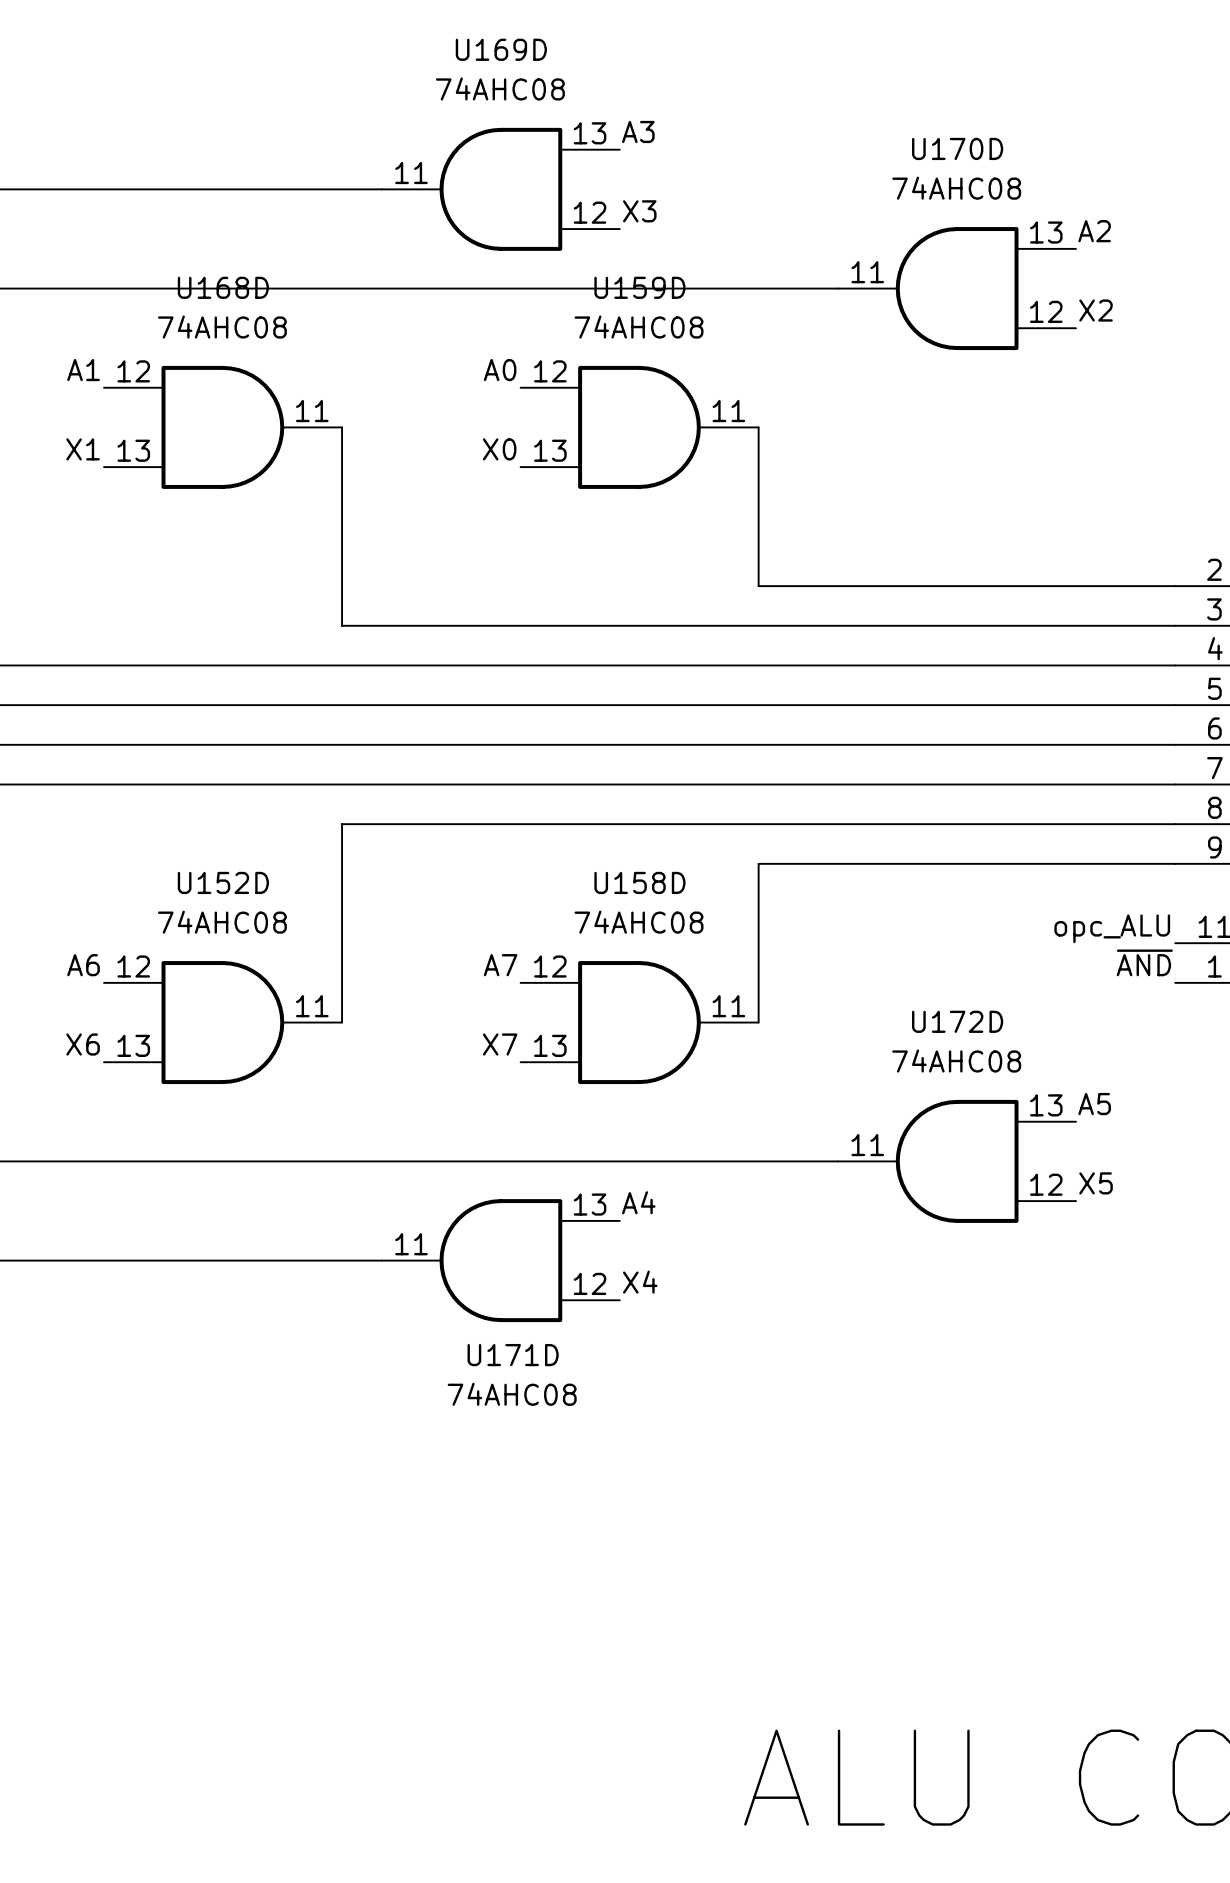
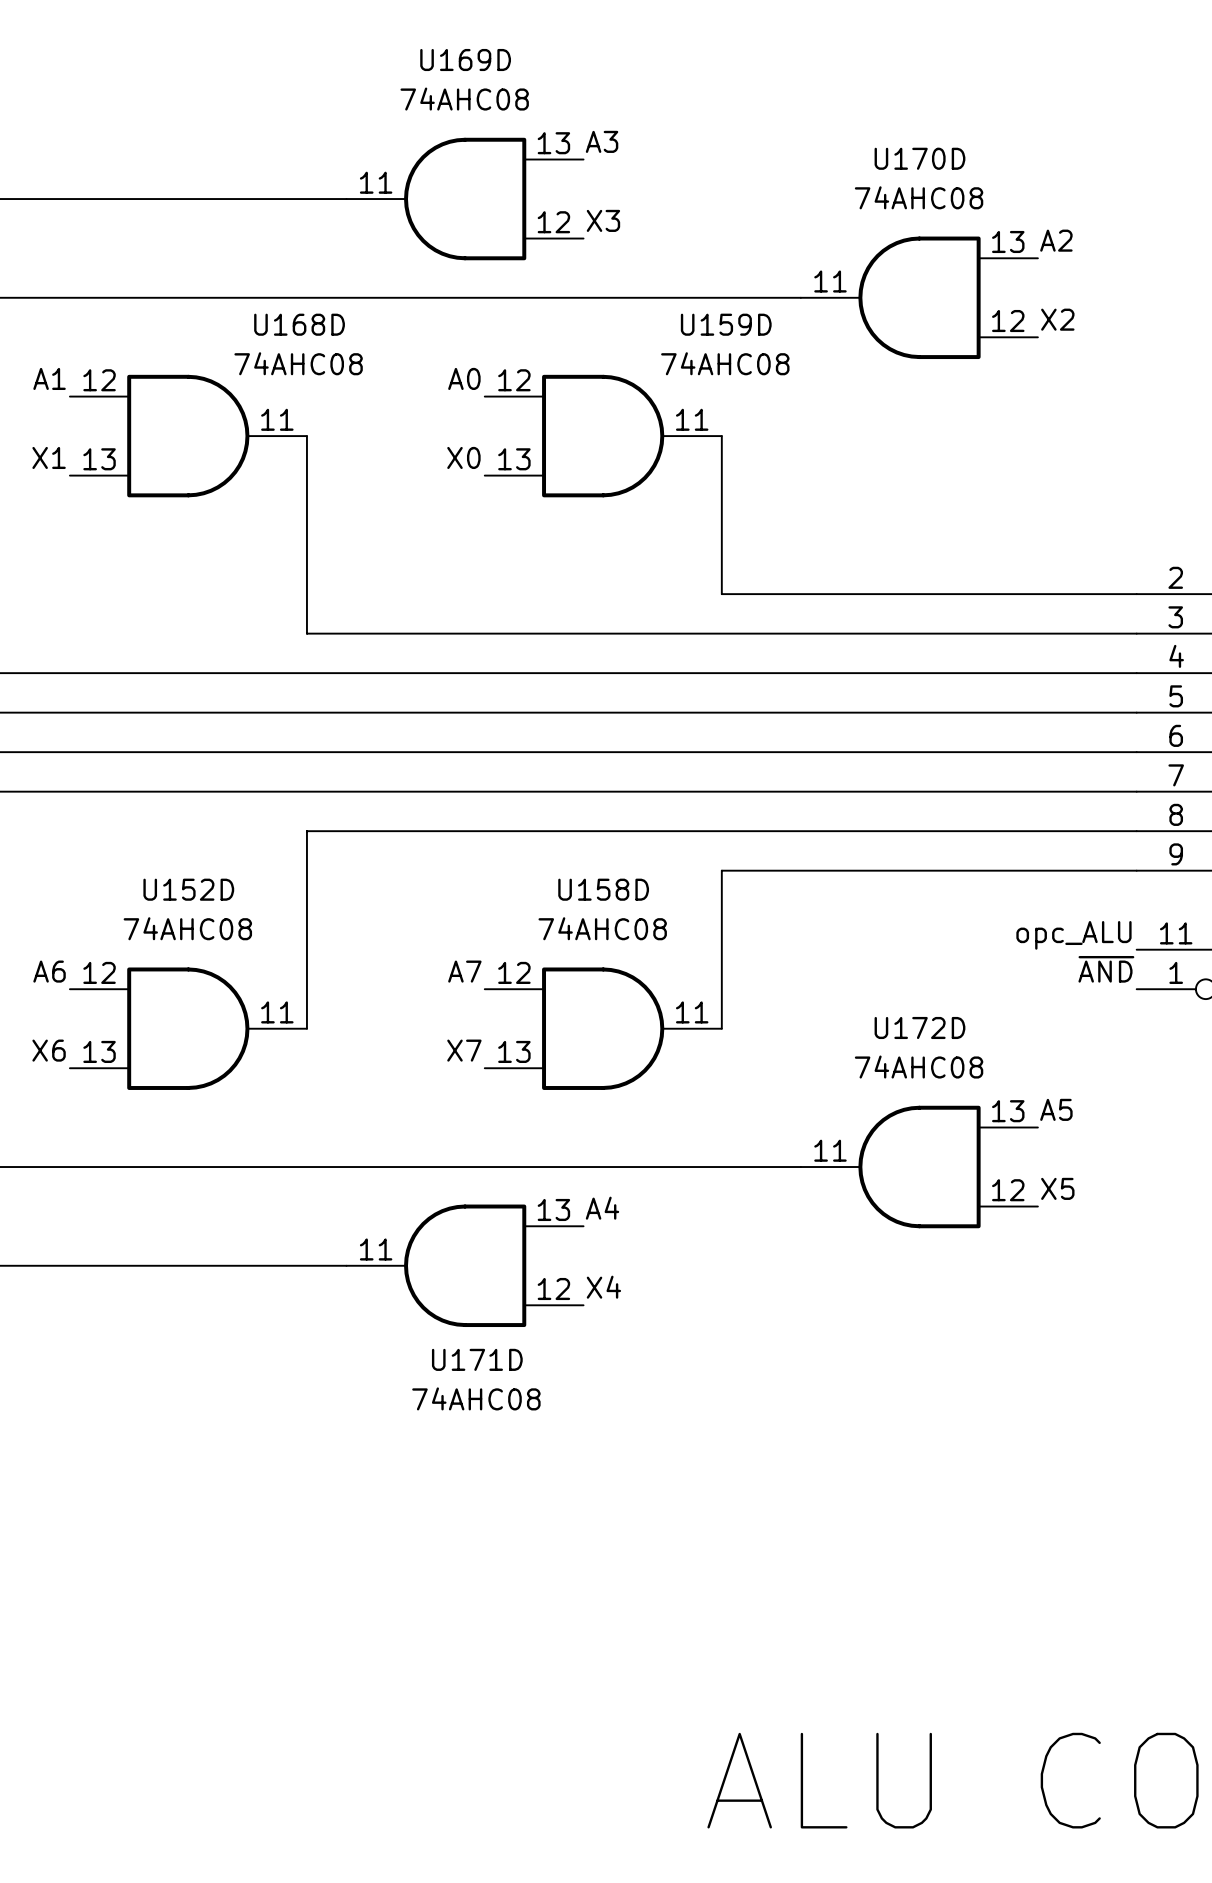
U168D name position: U168D (223, 287) -> U168D (299, 324)
U159D name position: U159D (639, 287) -> U159D (726, 324)
U168D value position: 74AHC08 (222, 327) -> 74AHC08 (298, 363)
U159D value position: 74AHC08 (639, 327) -> 74AHC08 (725, 363)

